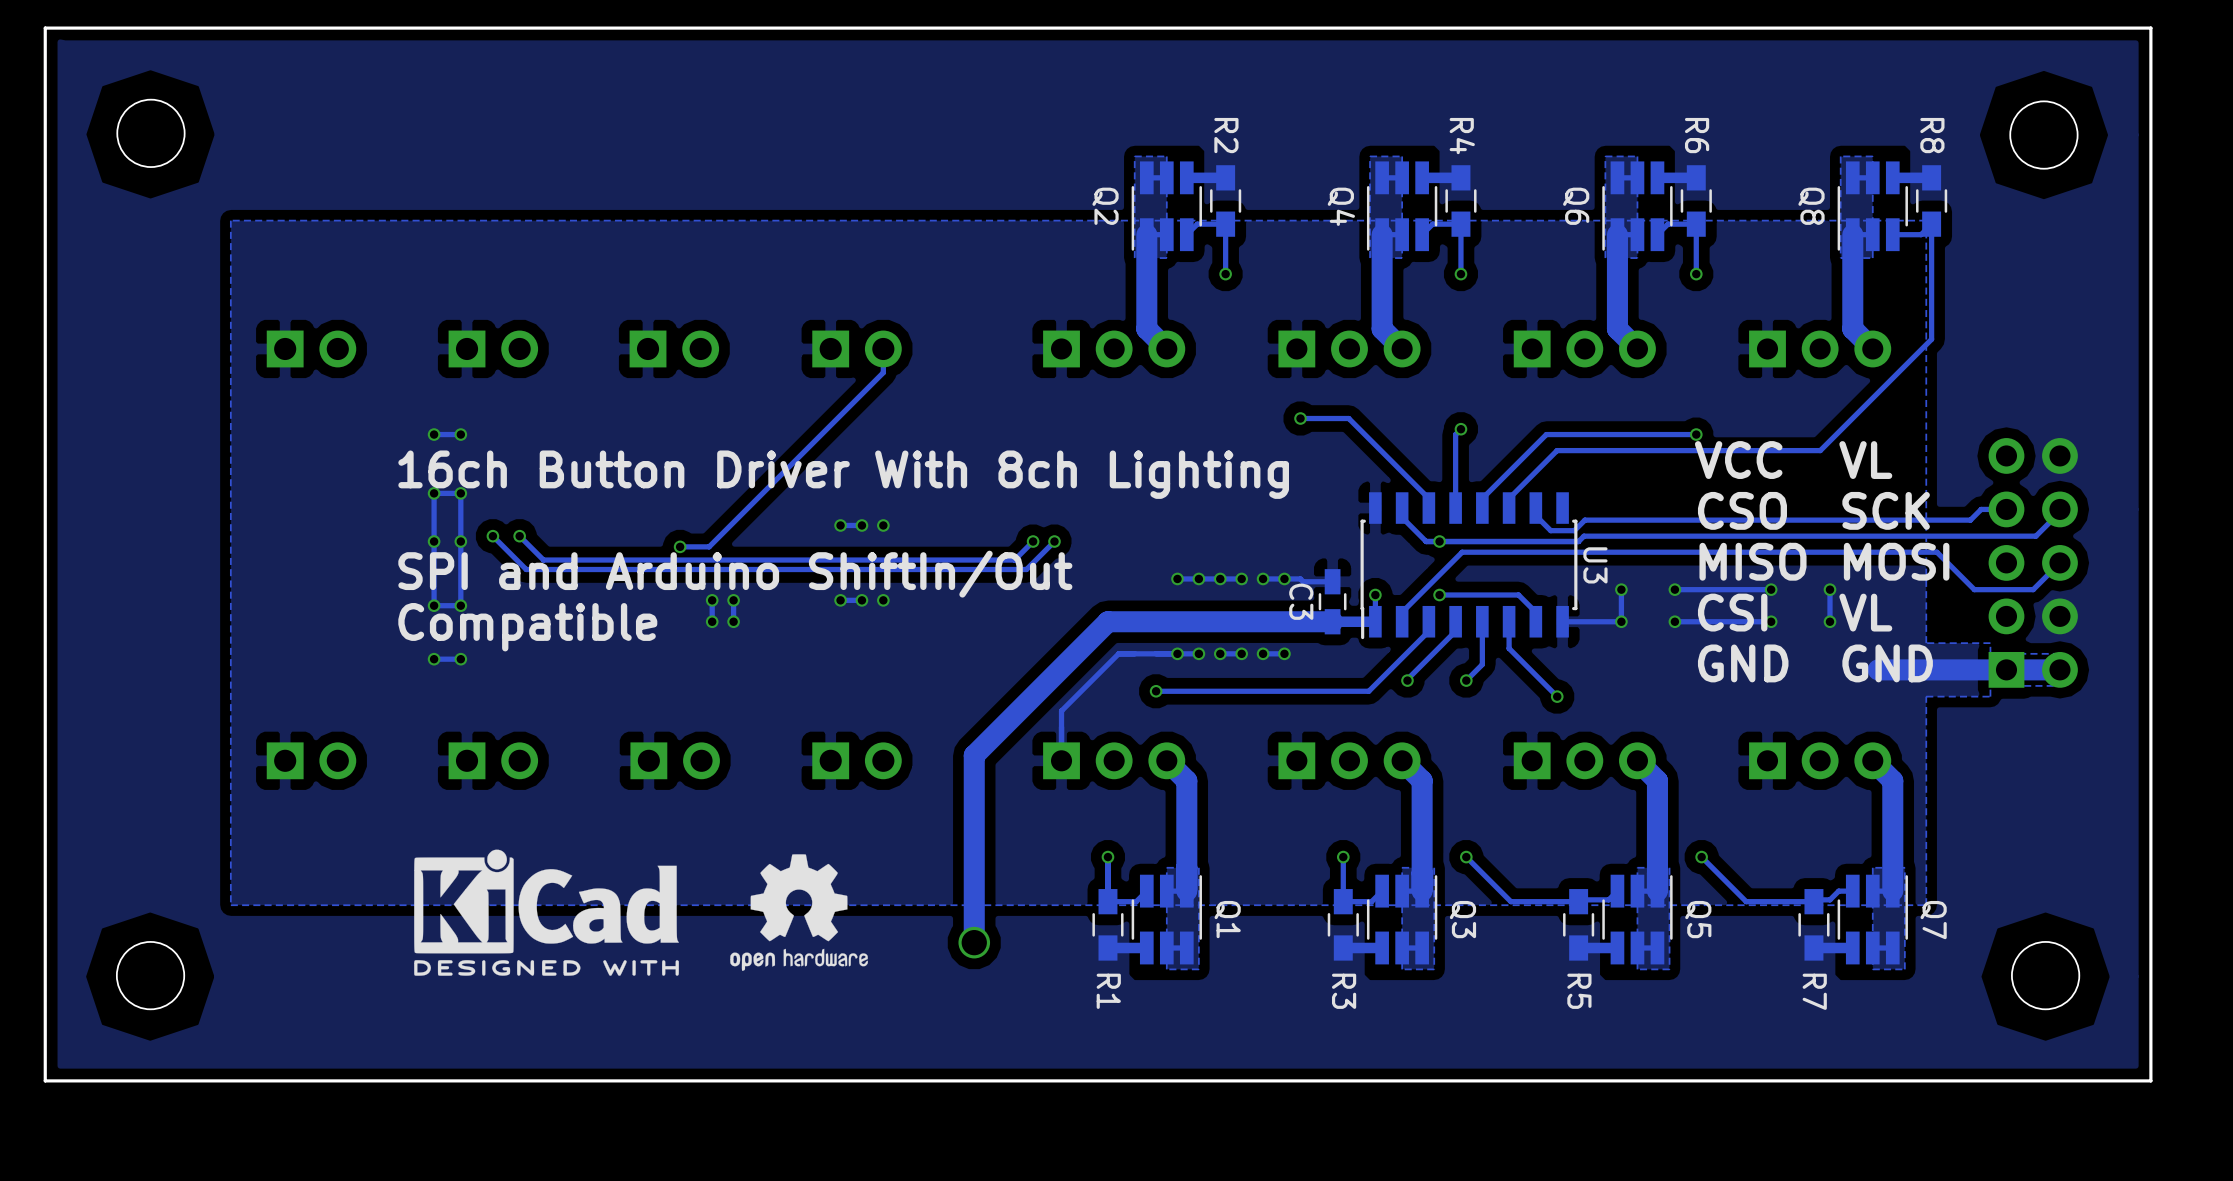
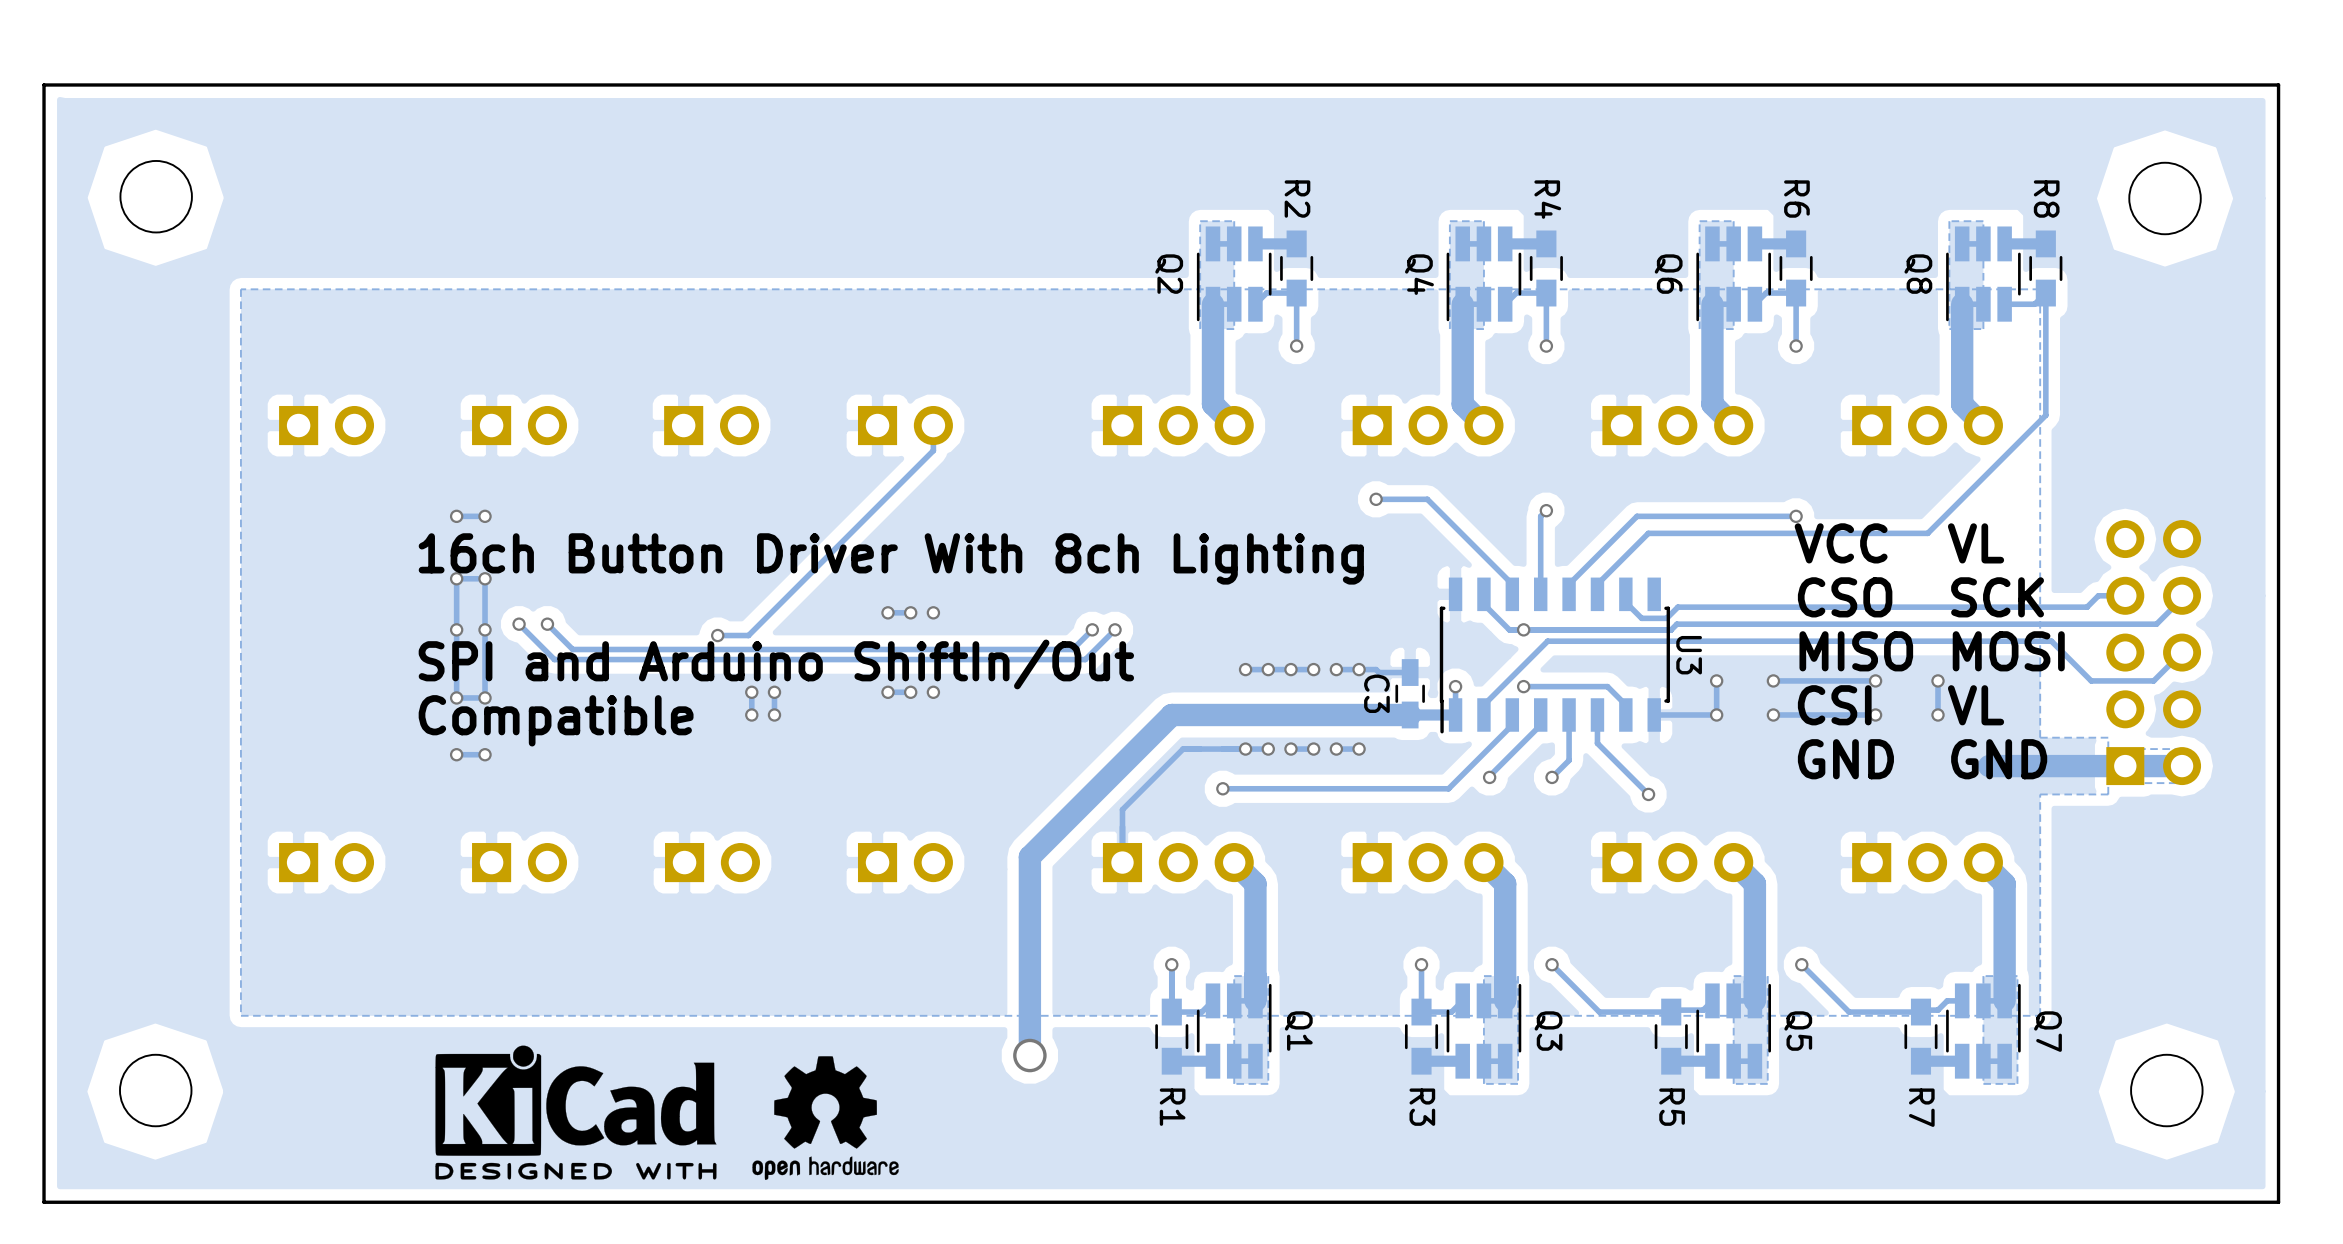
drawing position: (546, 912) -> (575, 1112)
drawing position: (799, 912) -> (825, 1118)

